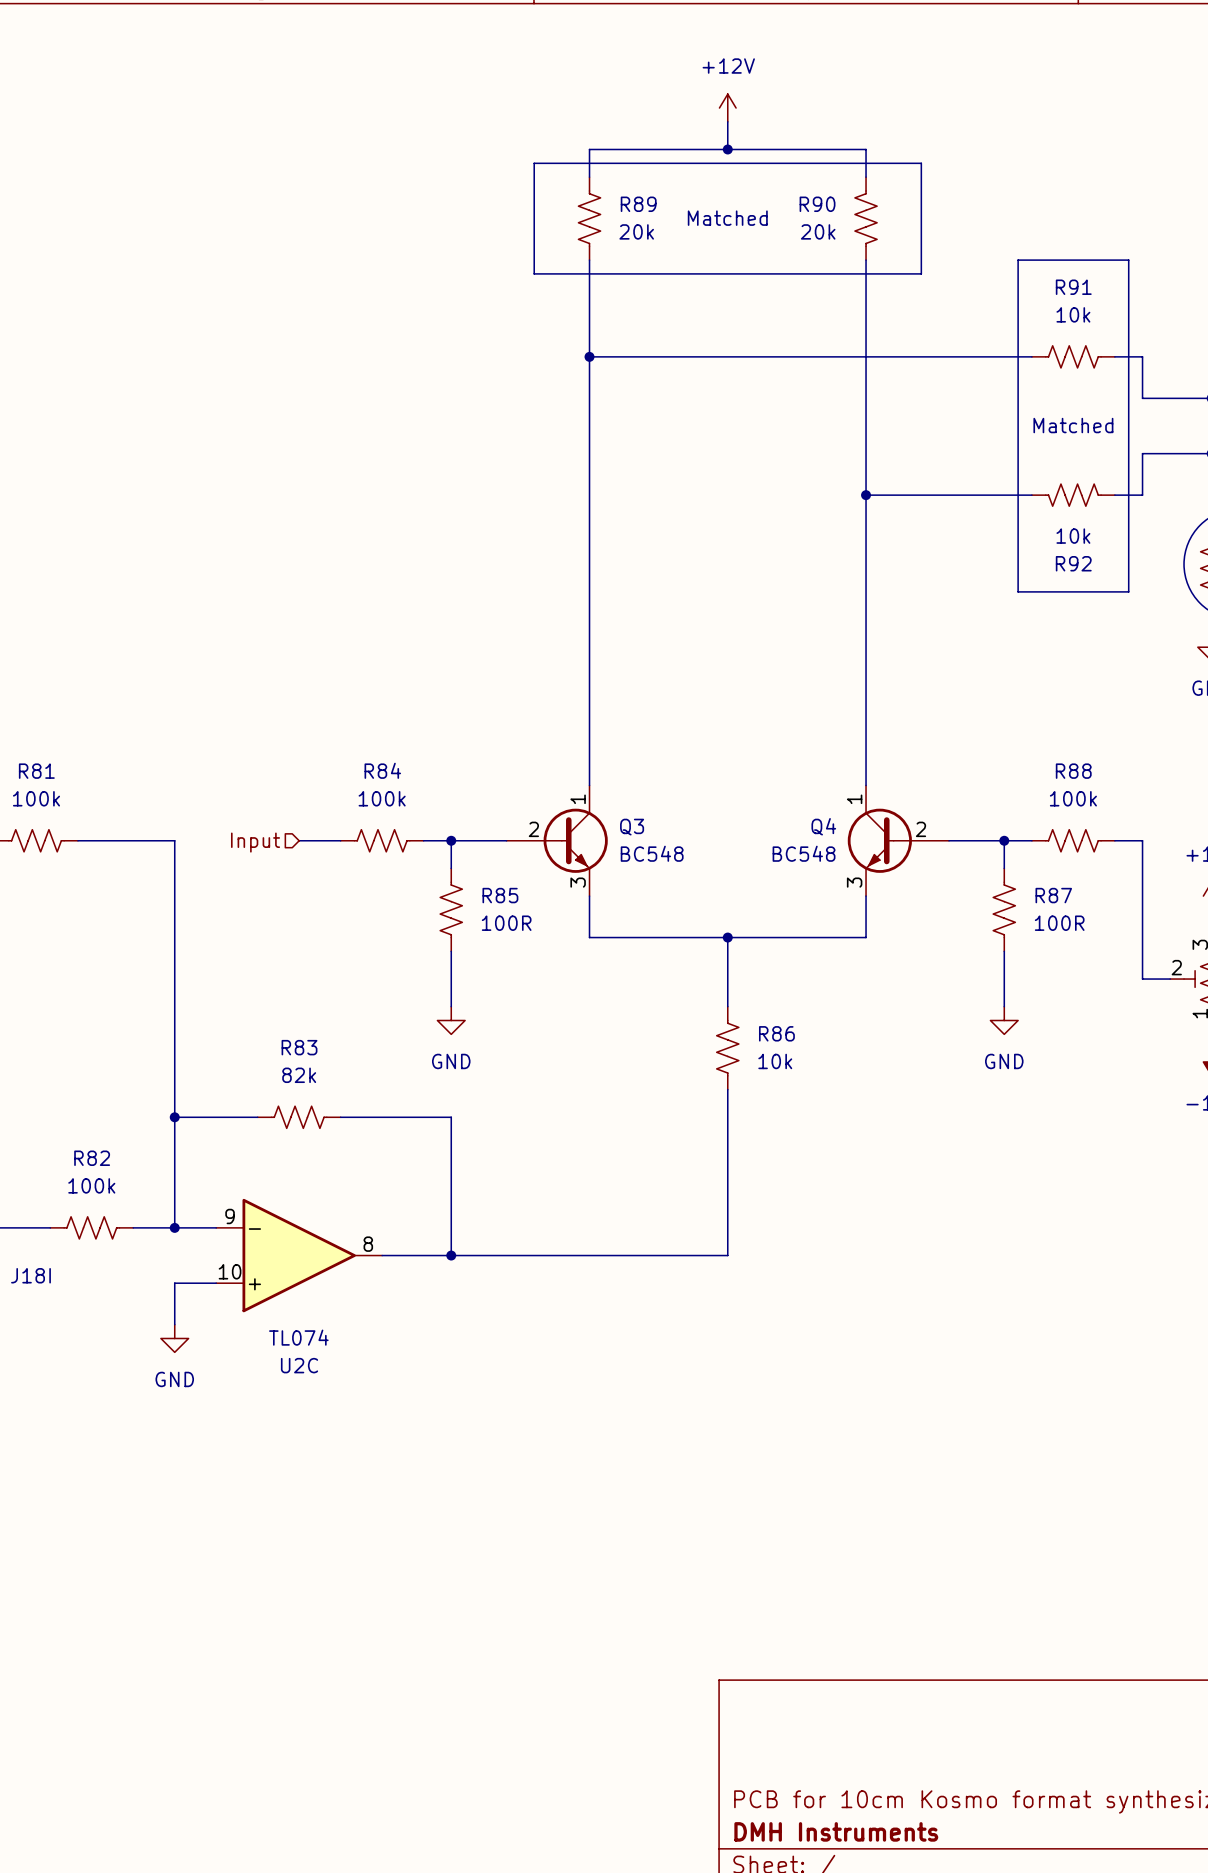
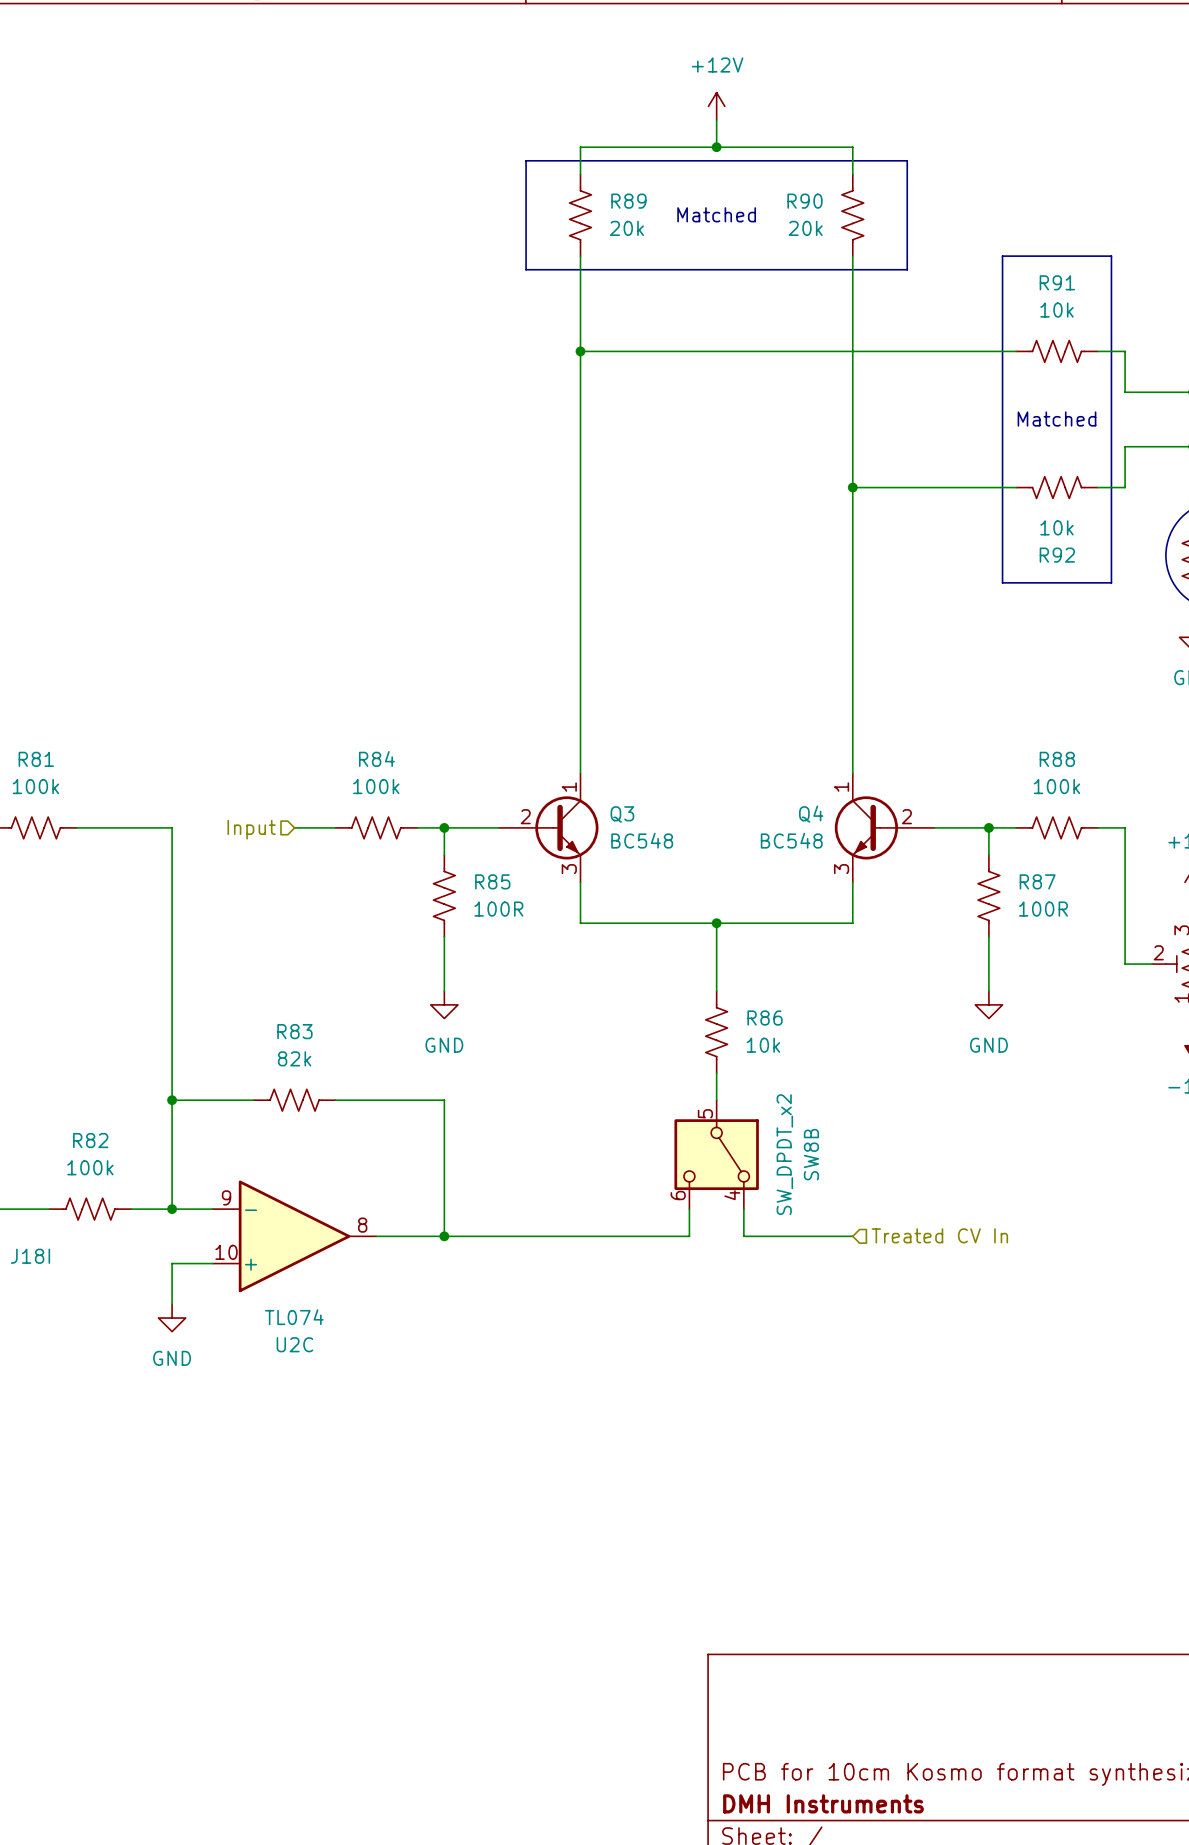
wire: (727, 1117) (727, 1255) (700, 1255) -> (689, 1209) (689, 1236)
SW8B: none -> SW_DPDT_x2 (716, 1154)
wire: none -> (743, 1209) (743, 1236) (852, 1236)
hierarchical label: none -> Treated CV In (939, 1235)

